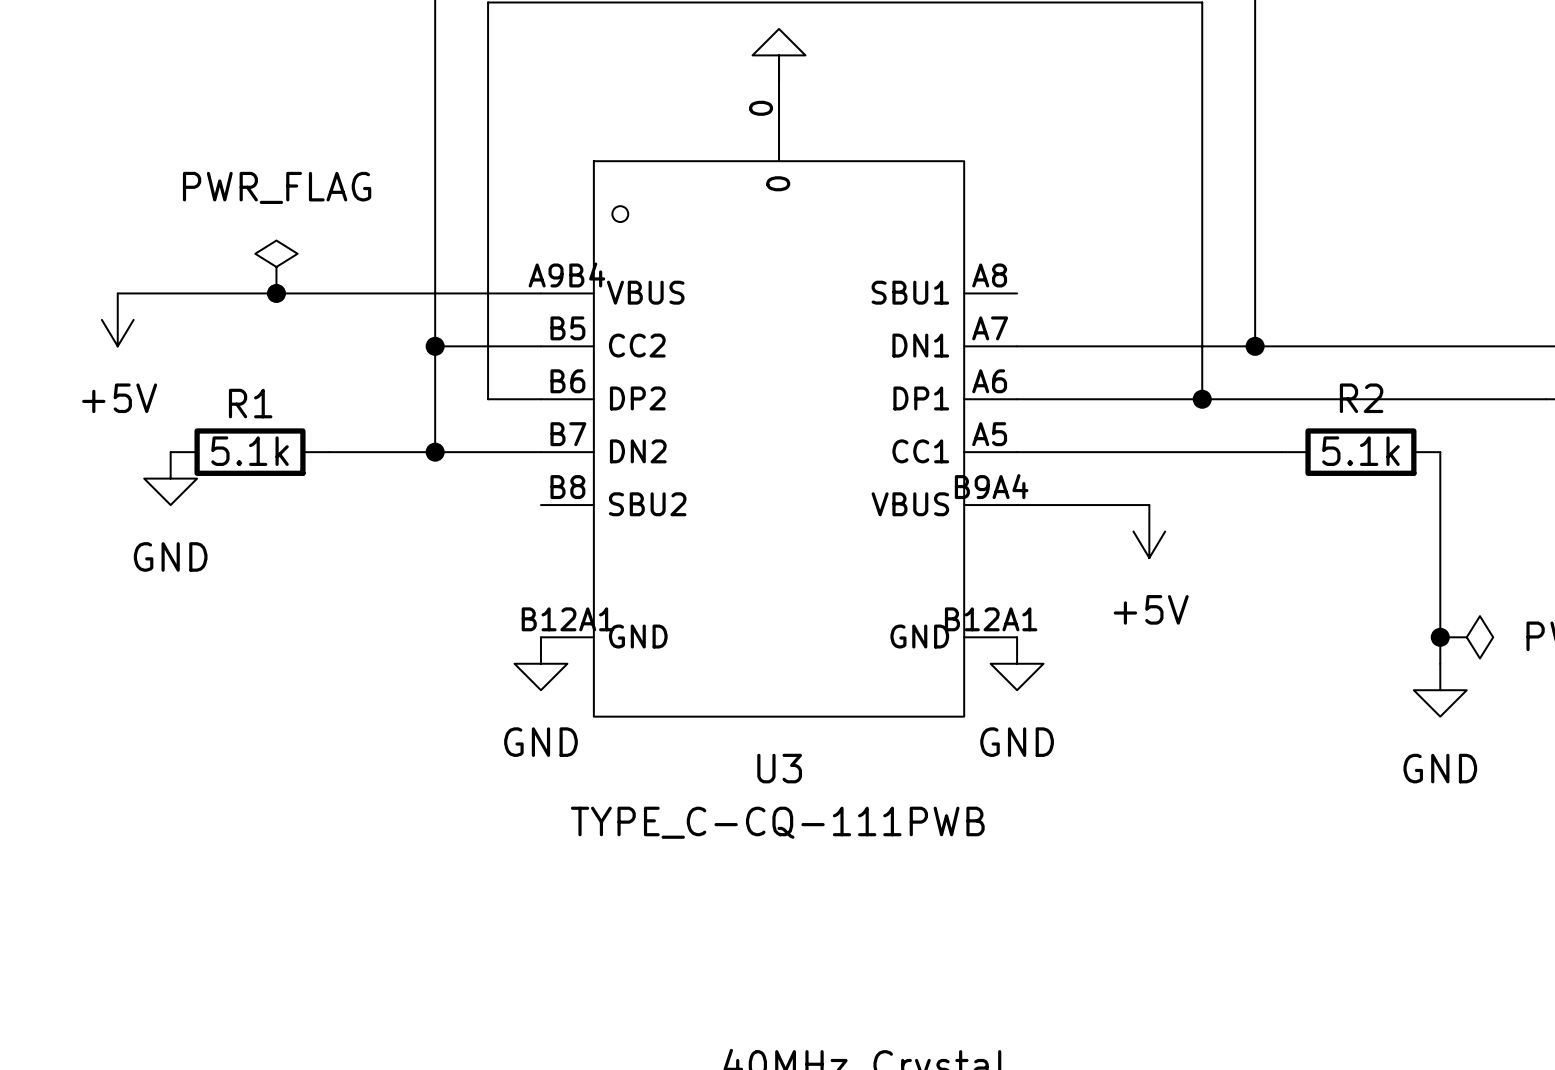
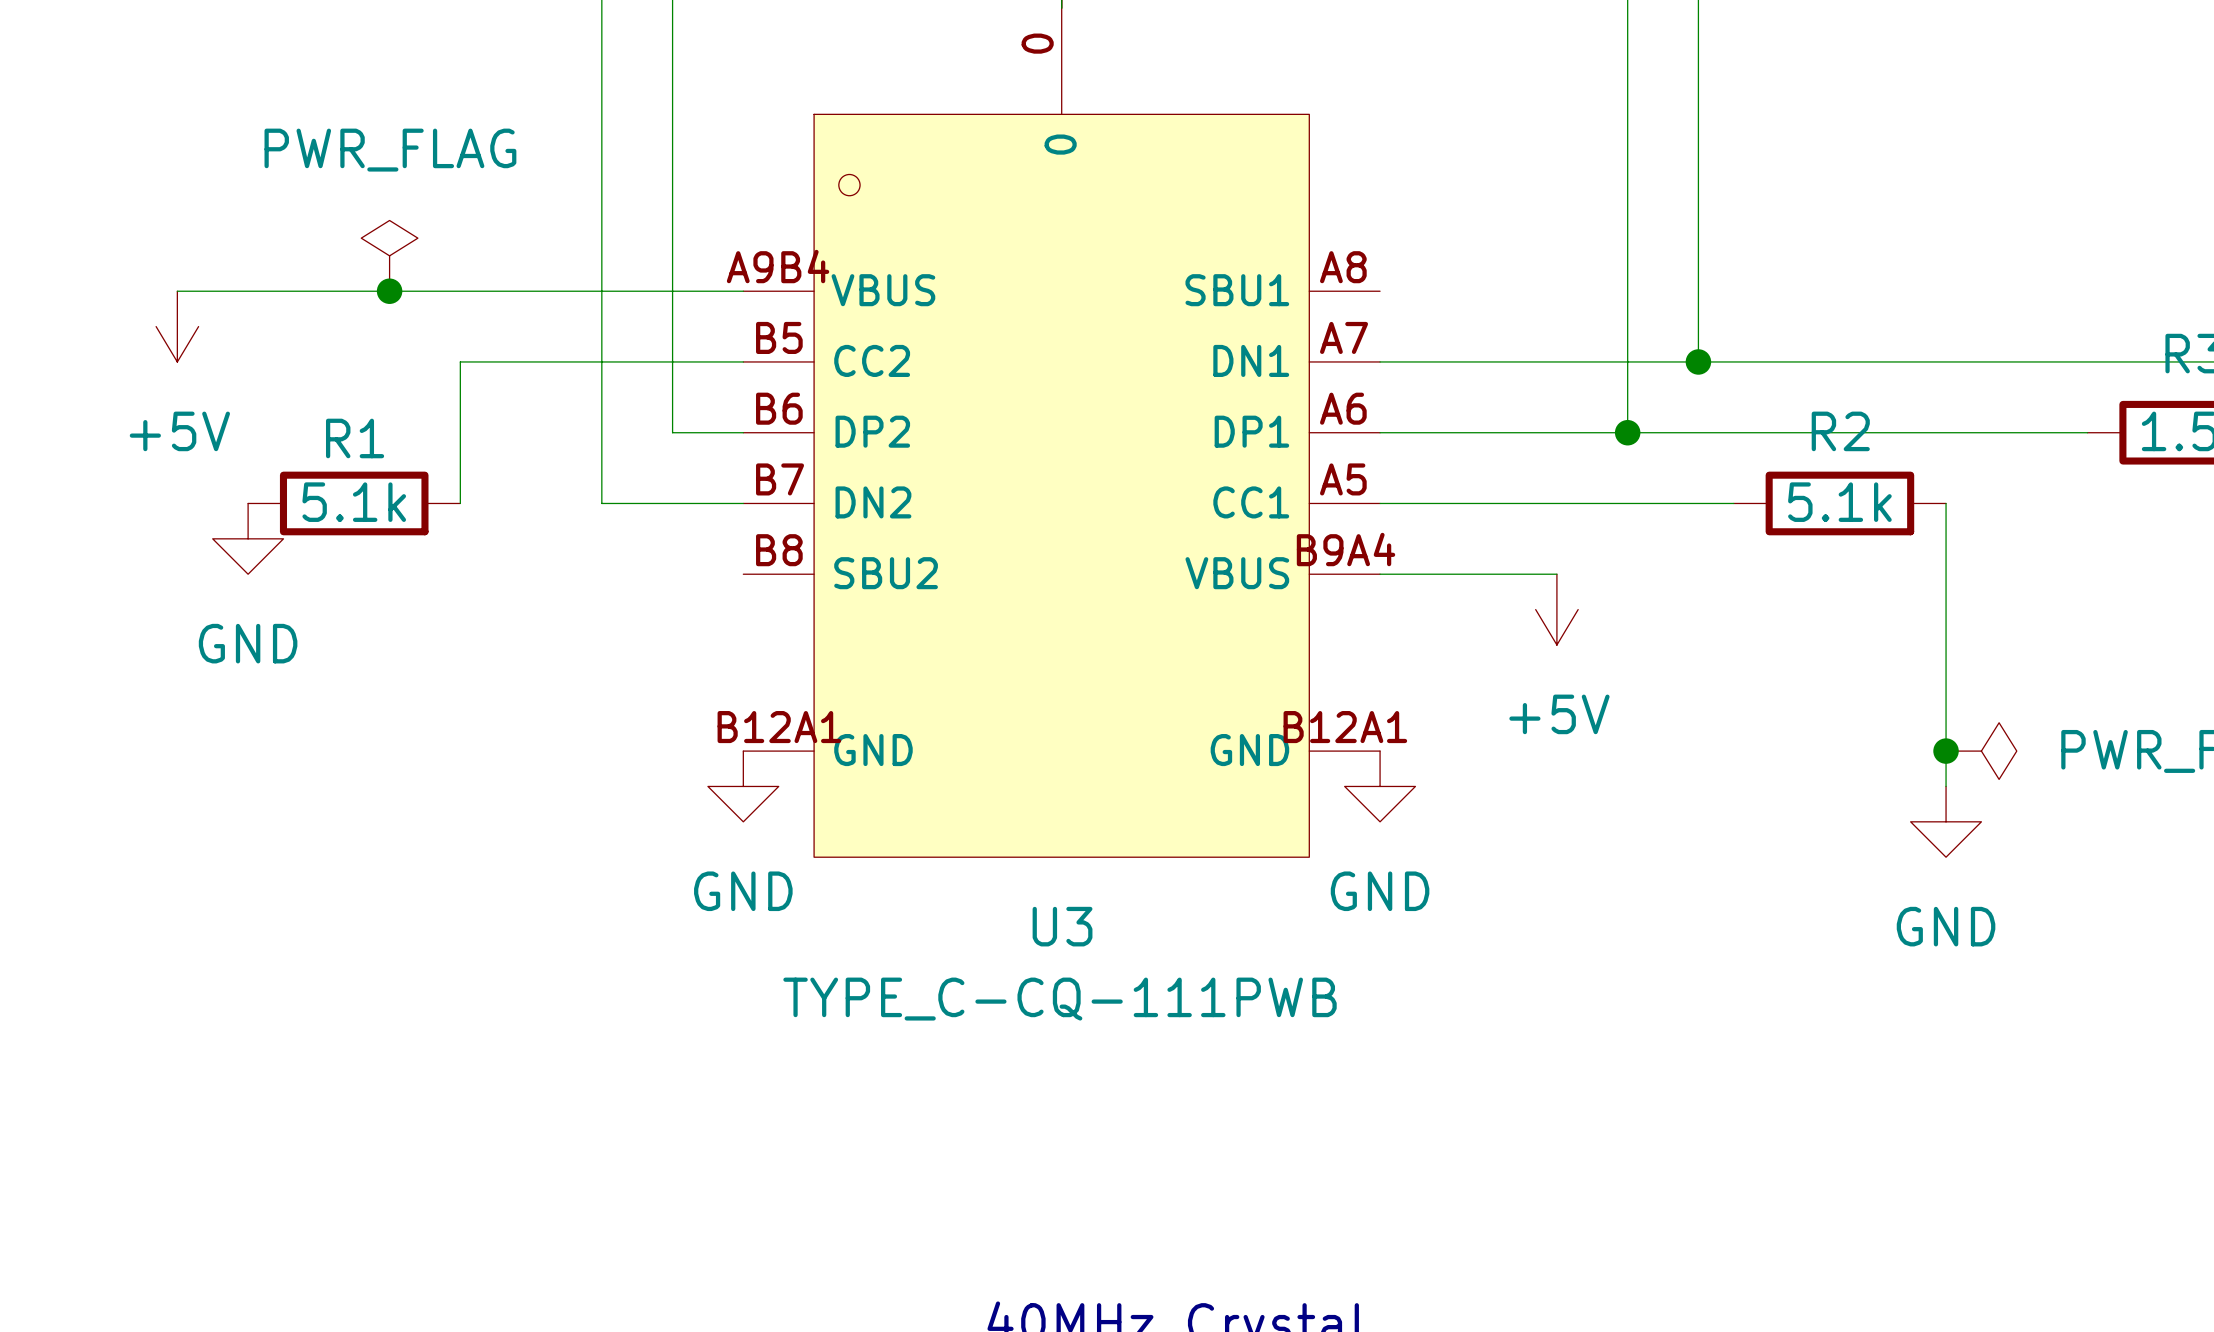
junction: (435, 346) -> none
wire: (329, 452) (435, 452) -> (460, 503) (460, 361) (601, 361)
junction: (435, 452) -> none

